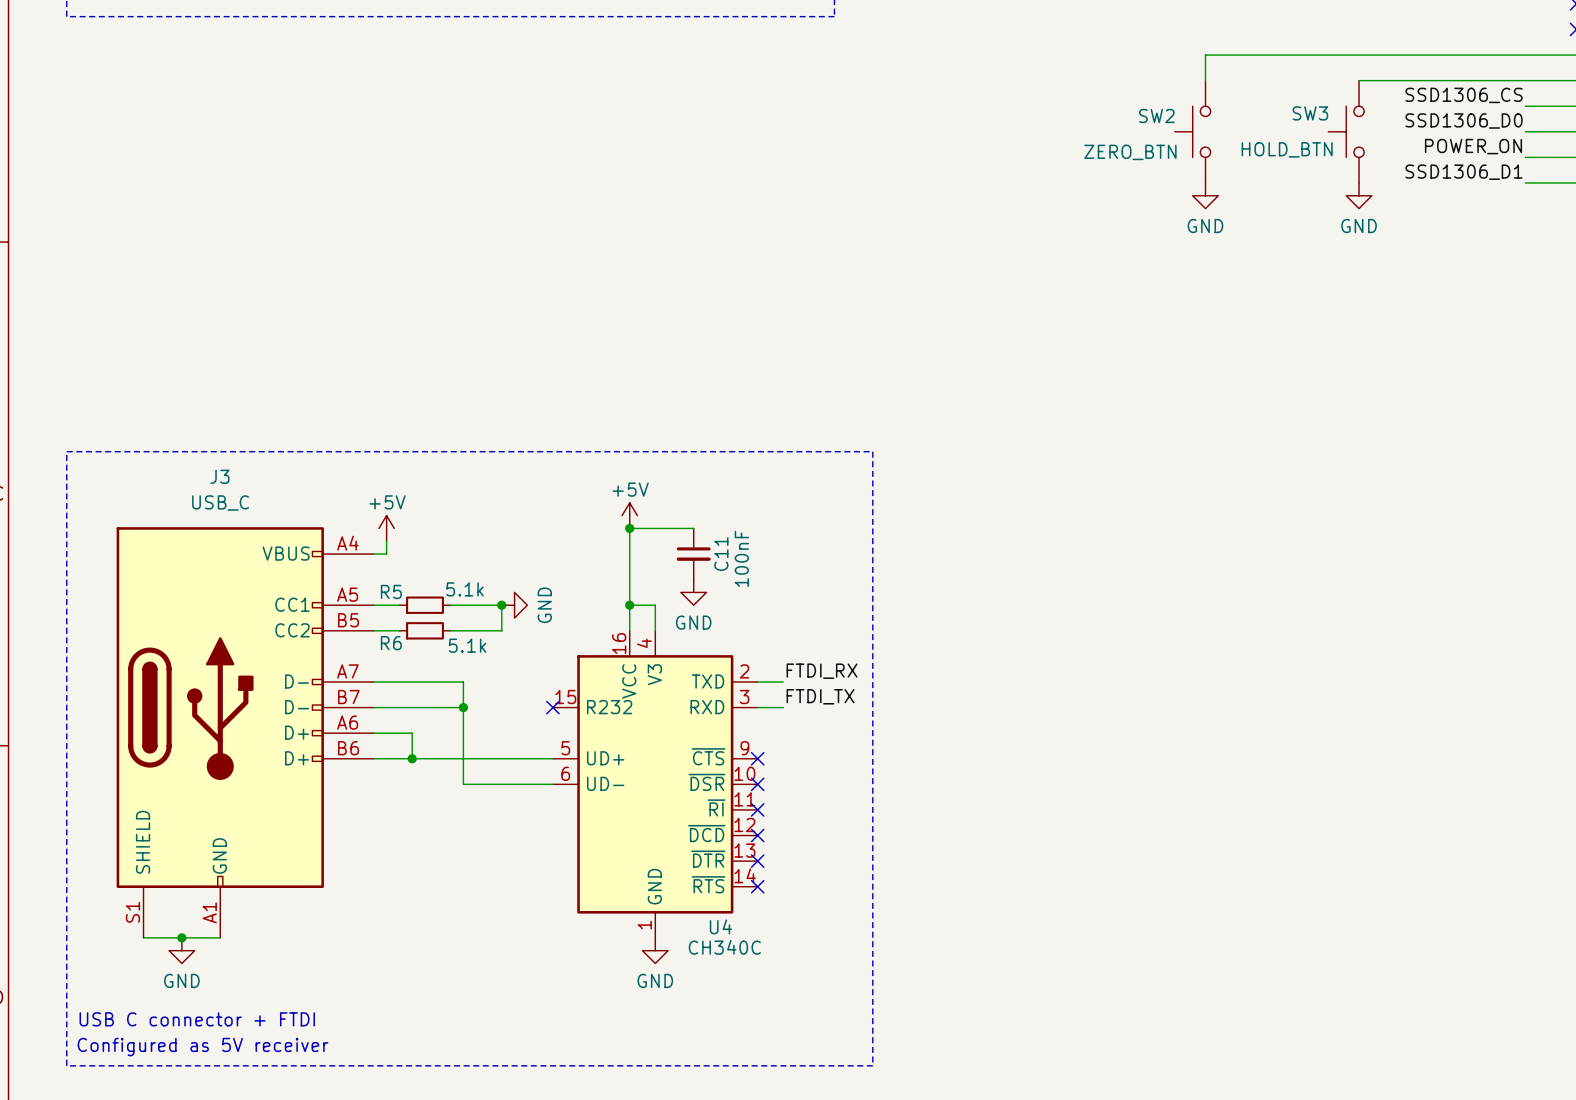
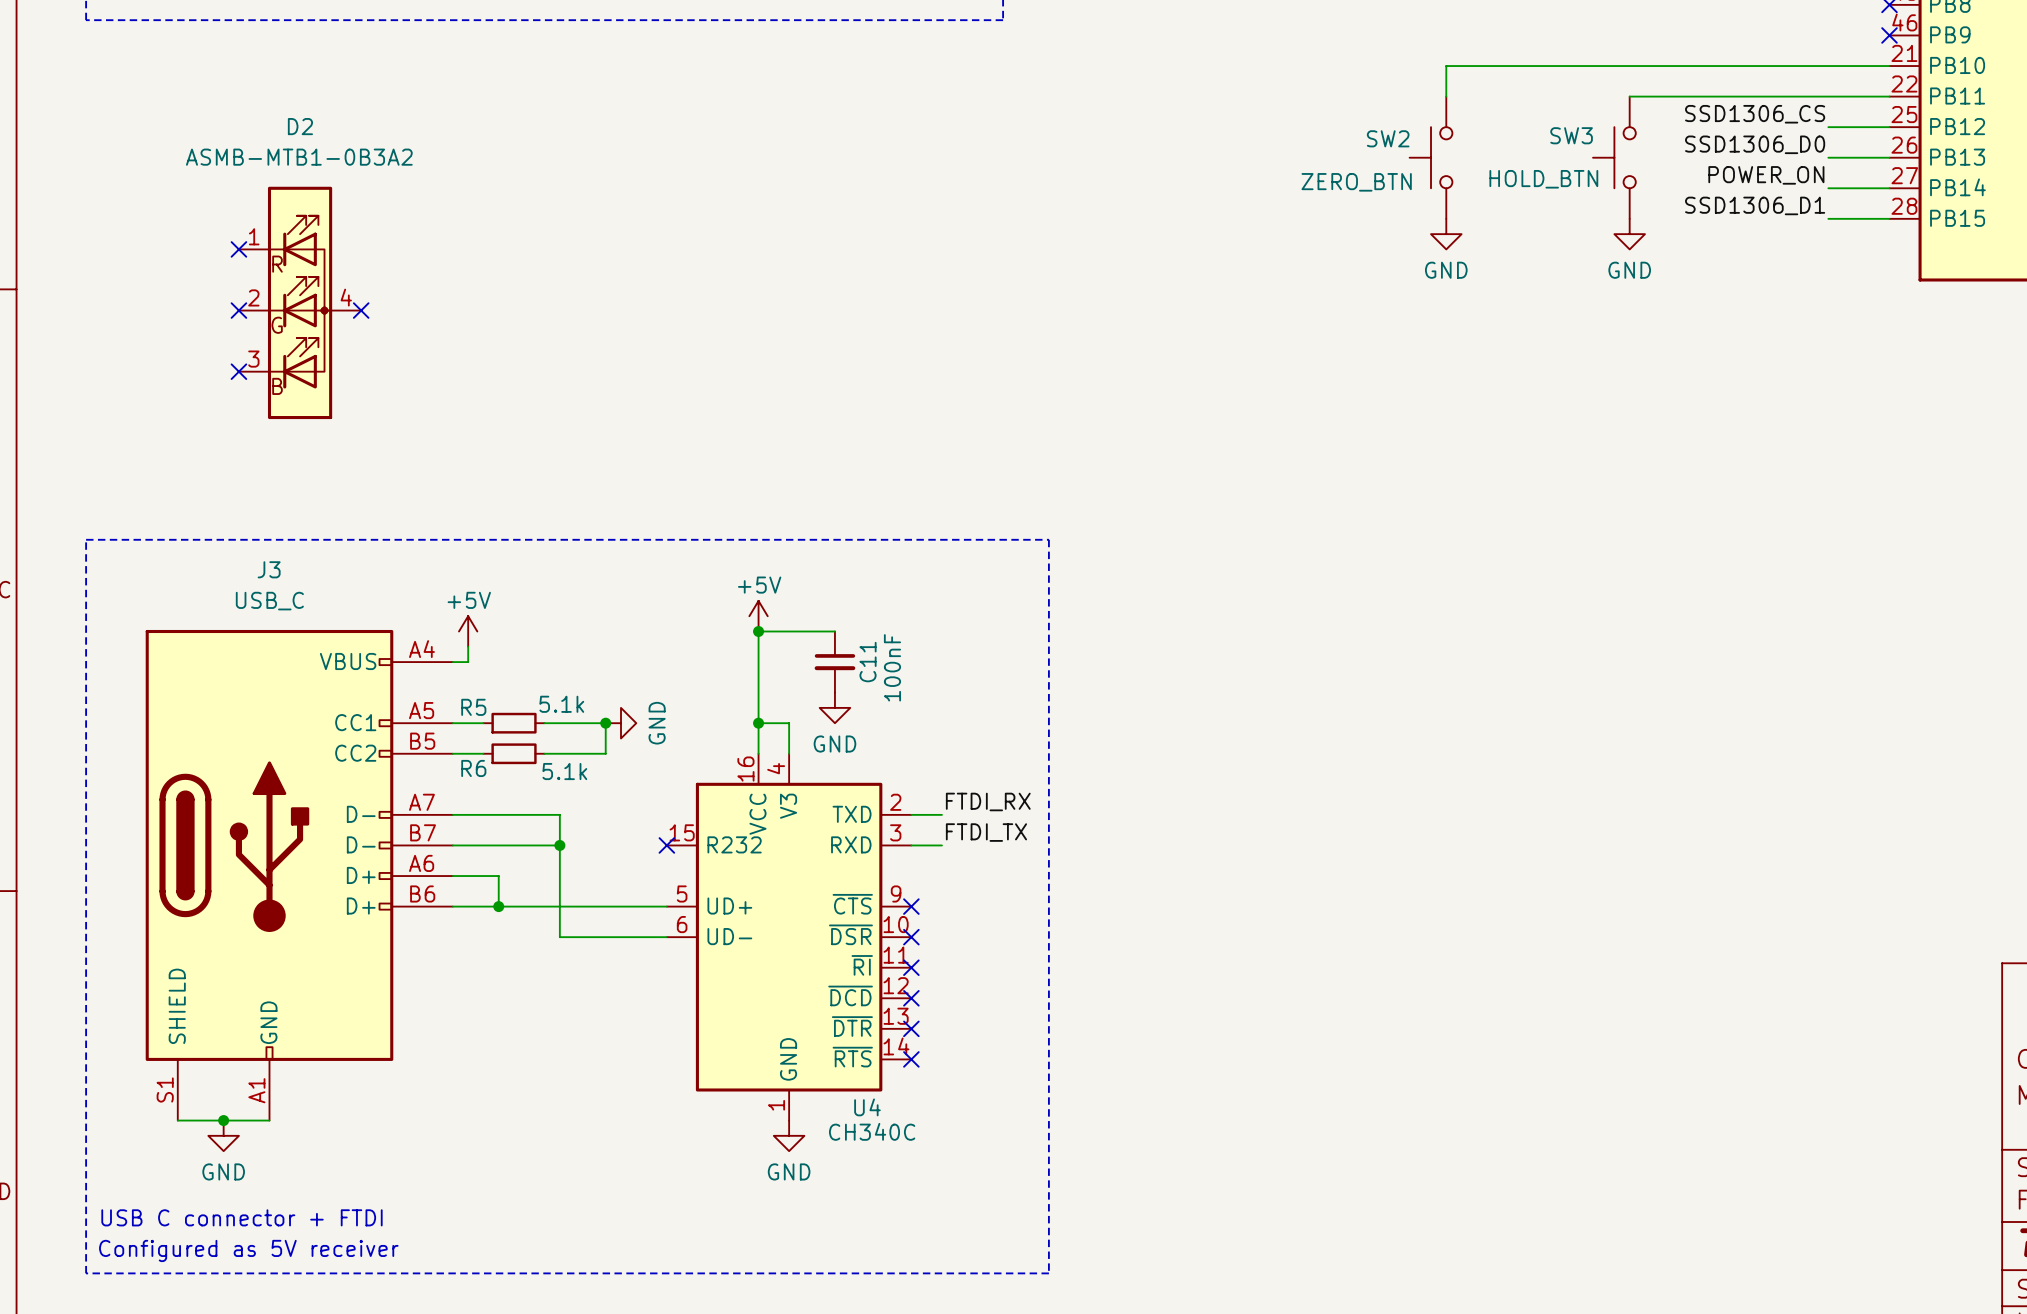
no-connect mark: none -> (238, 249)
D2: none -> ASMB-MTB1-0B3A2 (300, 302)
no-connect mark: none -> (238, 310)
no-connect mark: none -> (361, 310)
no-connect mark: none -> (238, 371)

